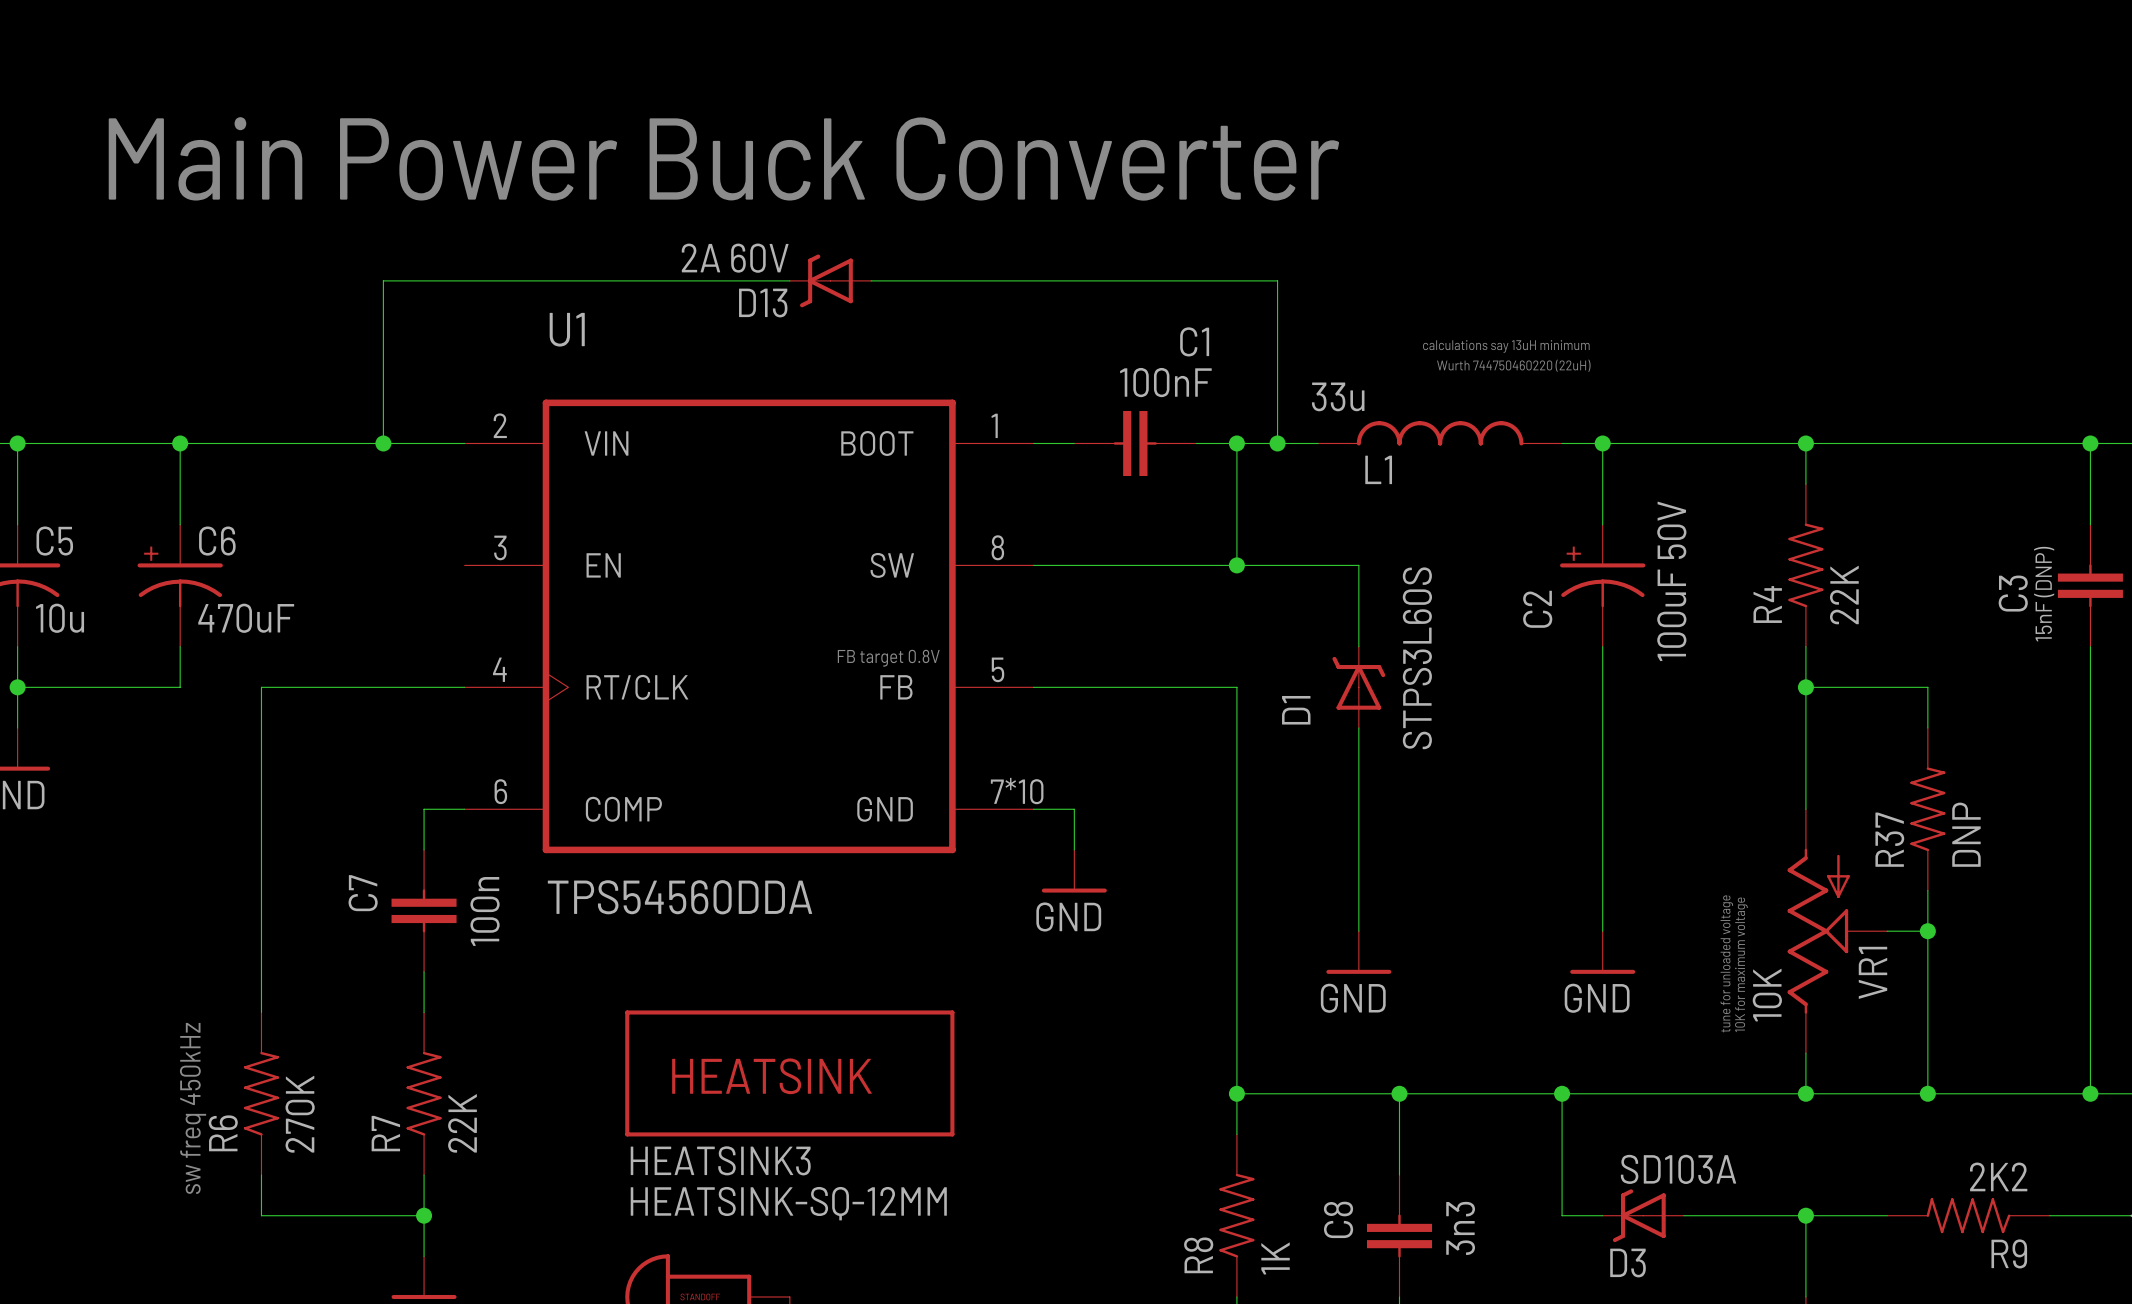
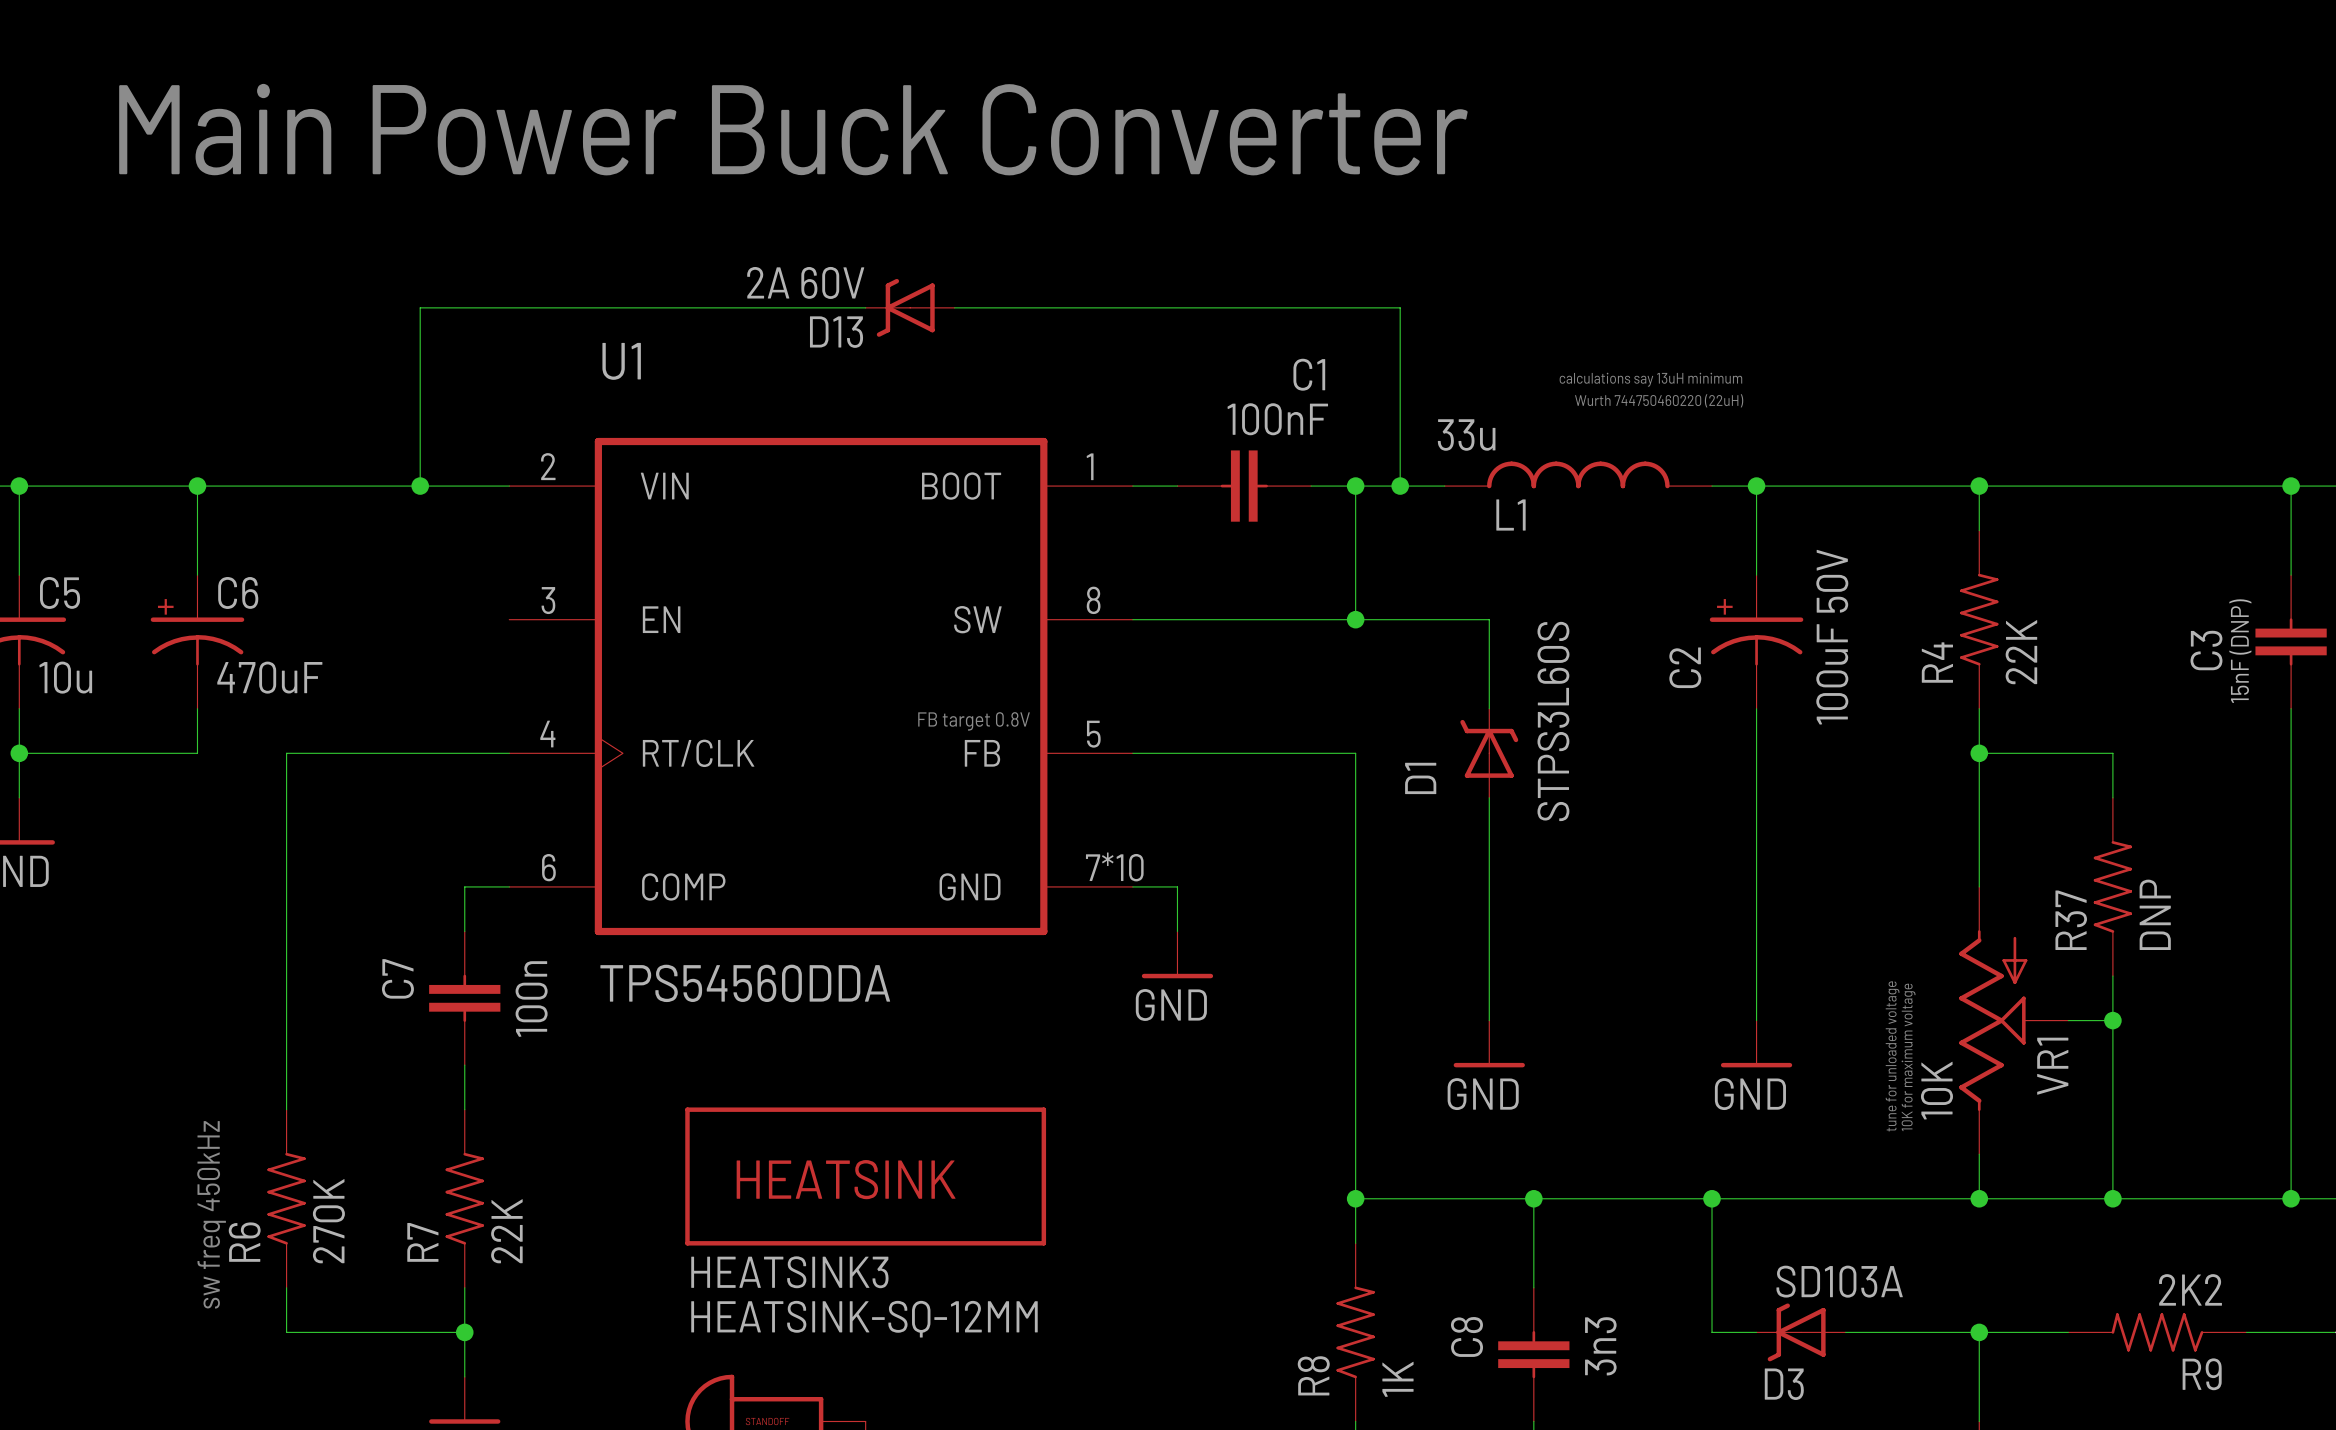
text position: Main Power Buck Converter (723, 158) -> Main Power Buck Converter (793, 129)

